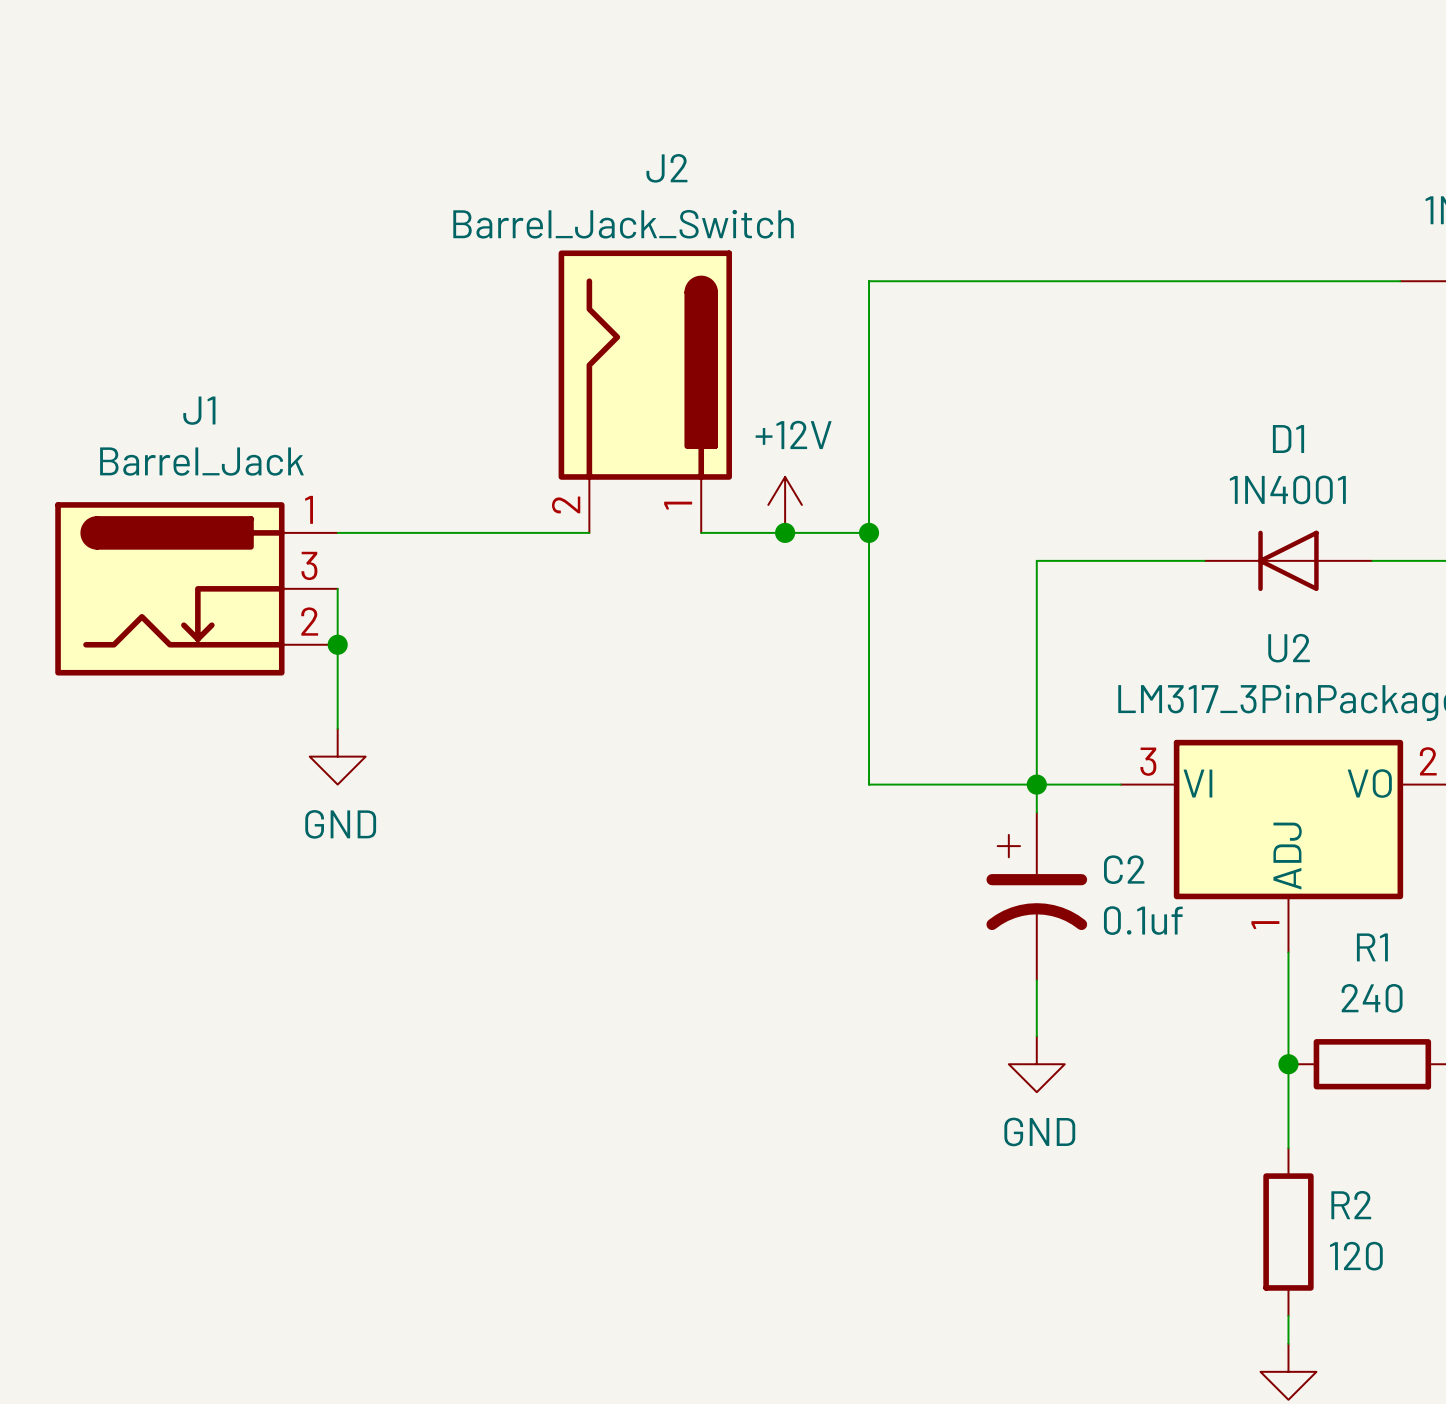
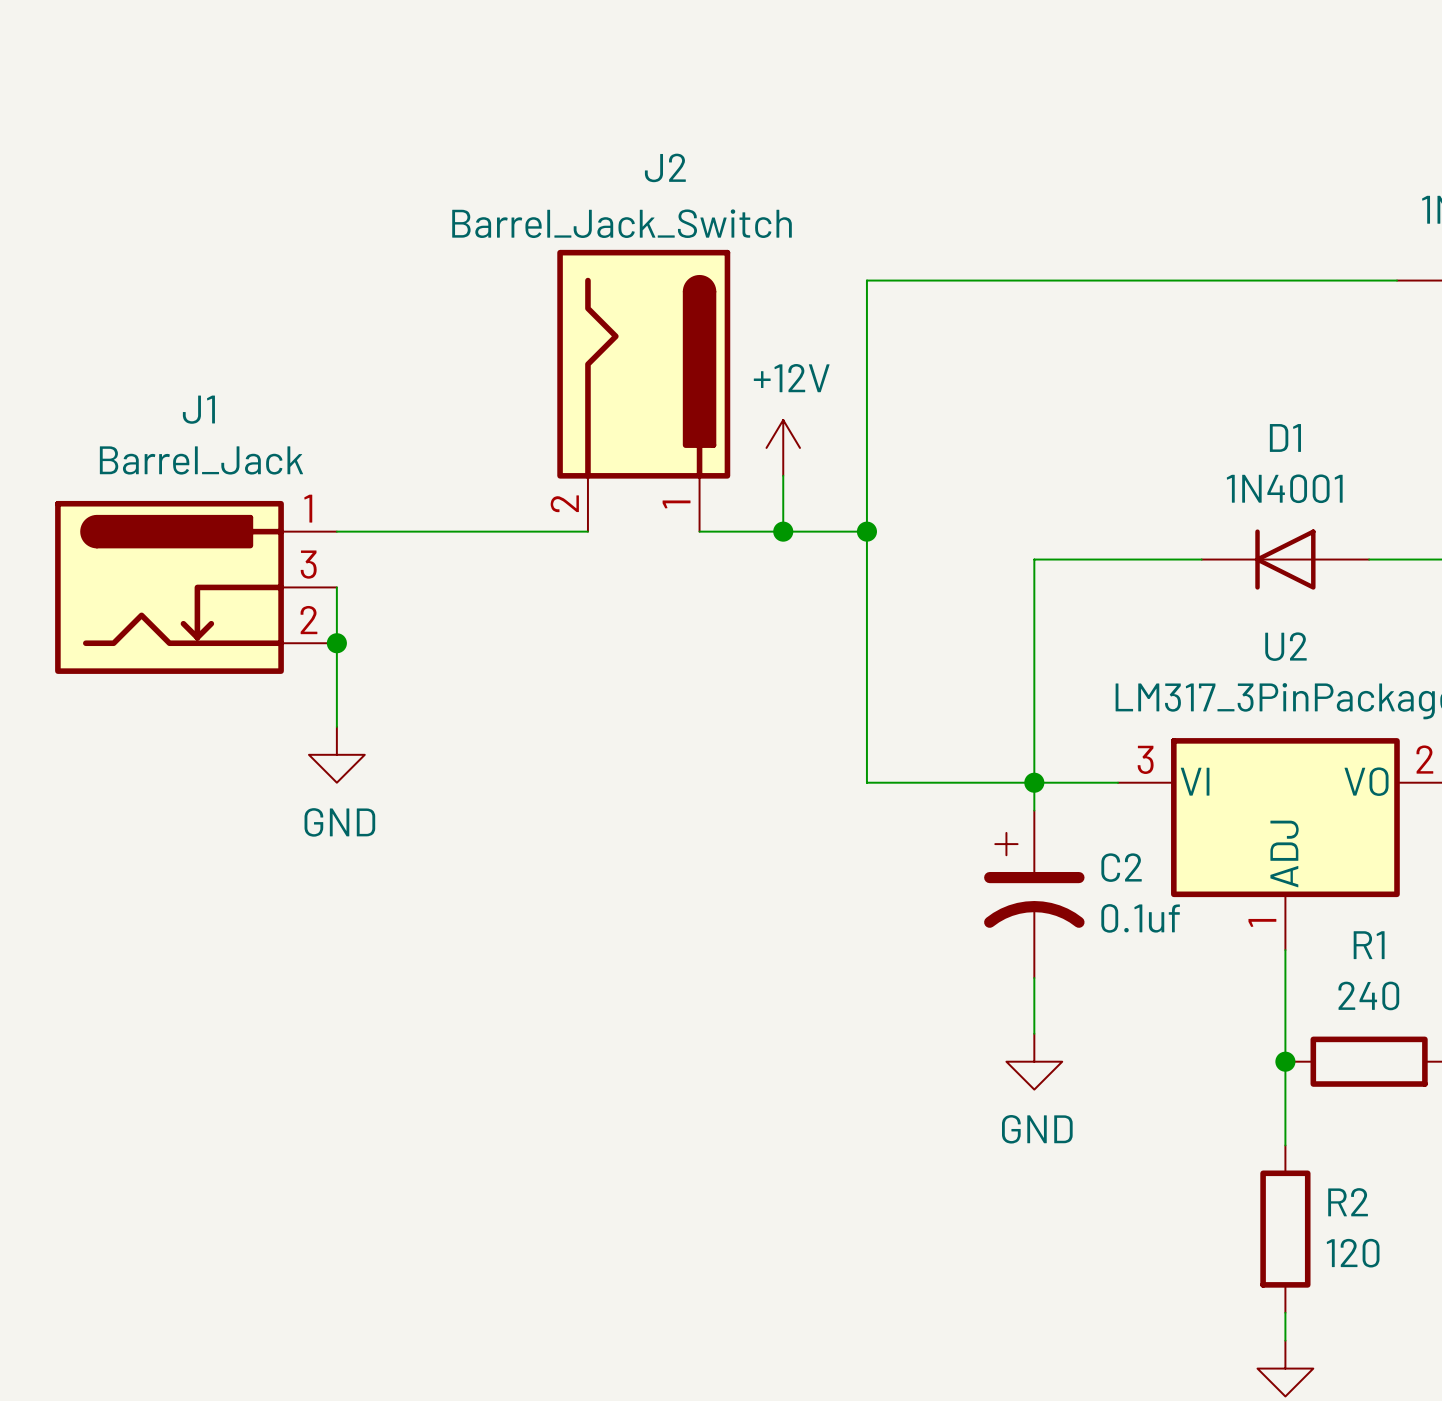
power symbol position: +12V (785, 504) -> +12V (783, 447)

